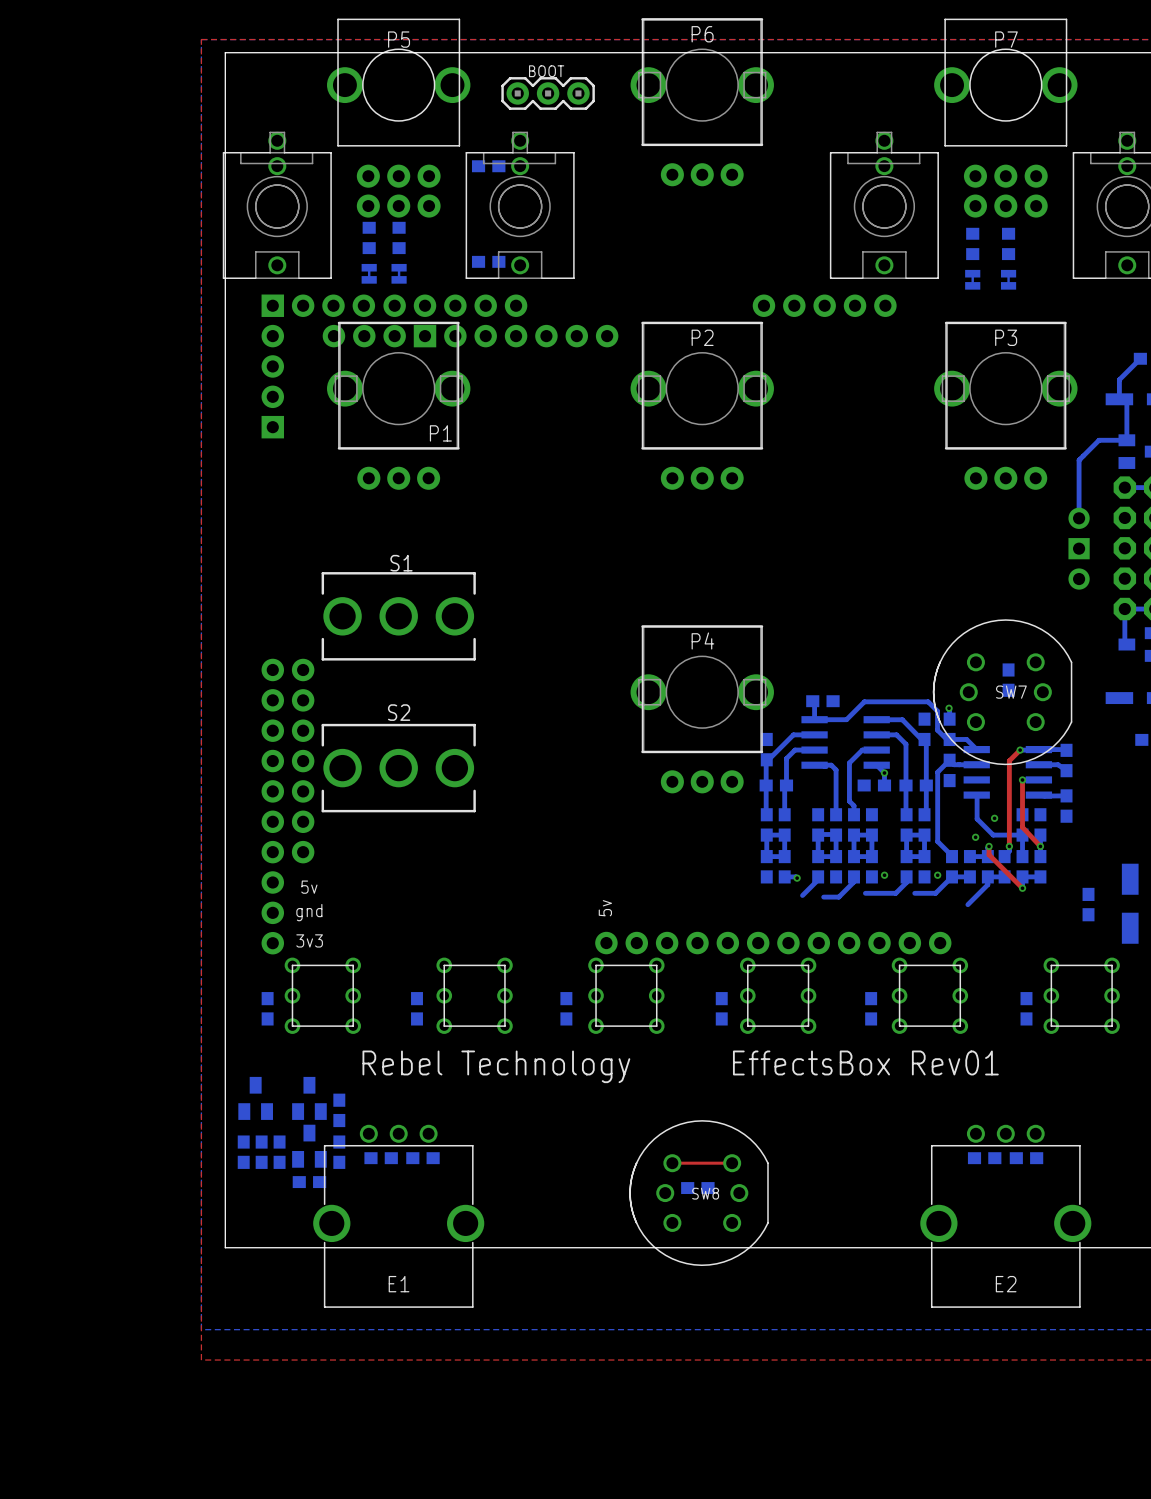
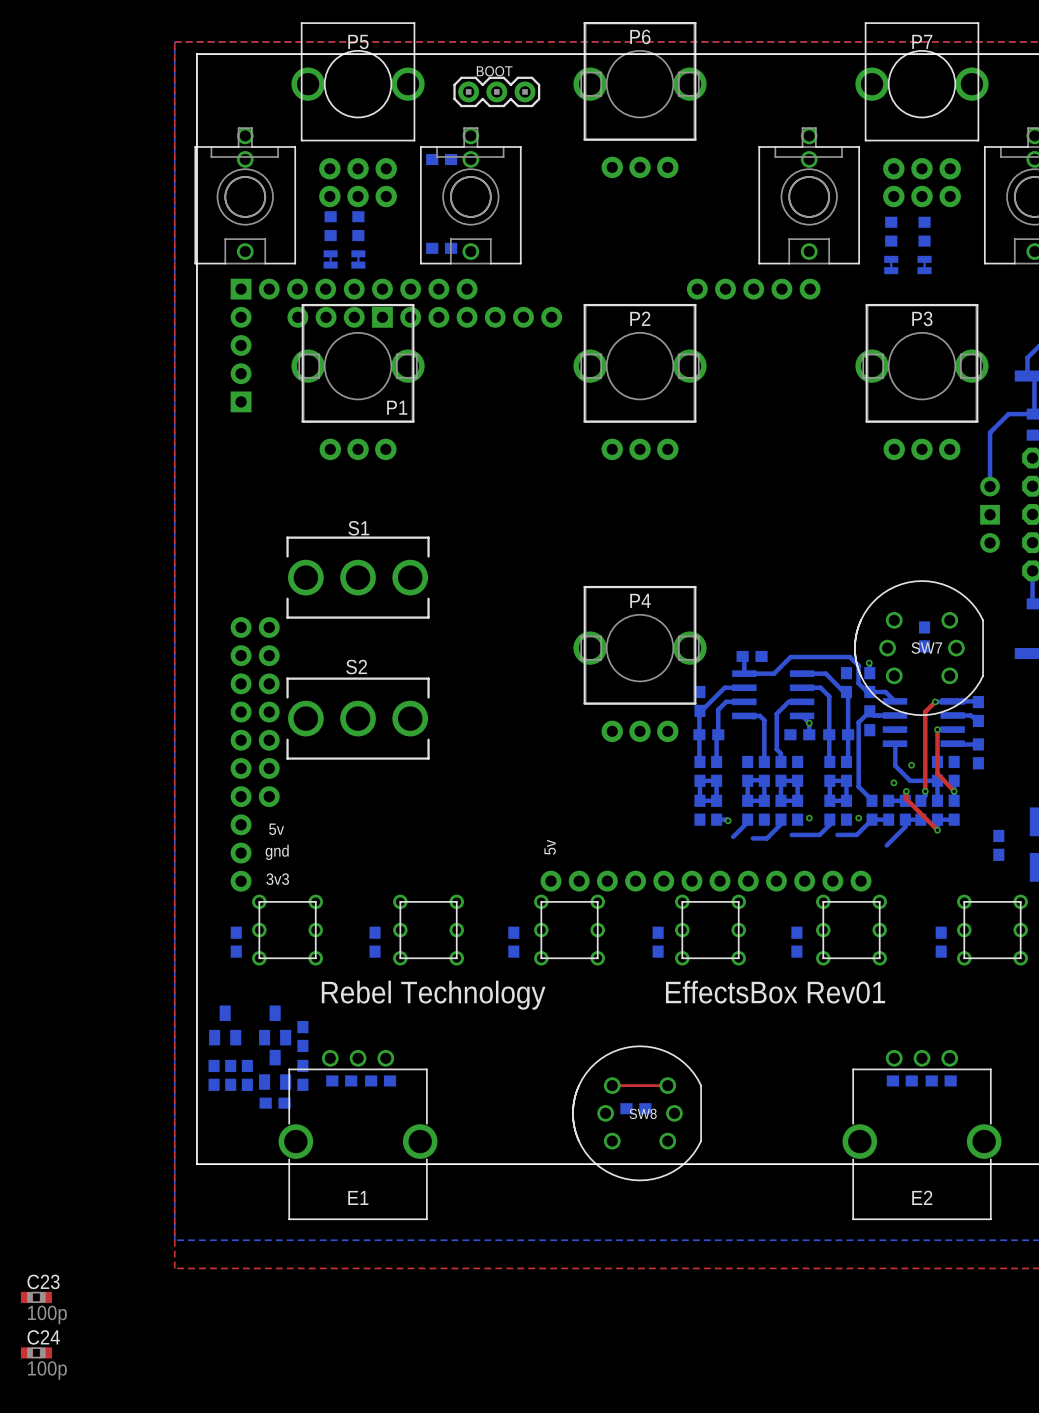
C23: none -> 100p (36, 1297)
C24: none -> 100p (36, 1352)

